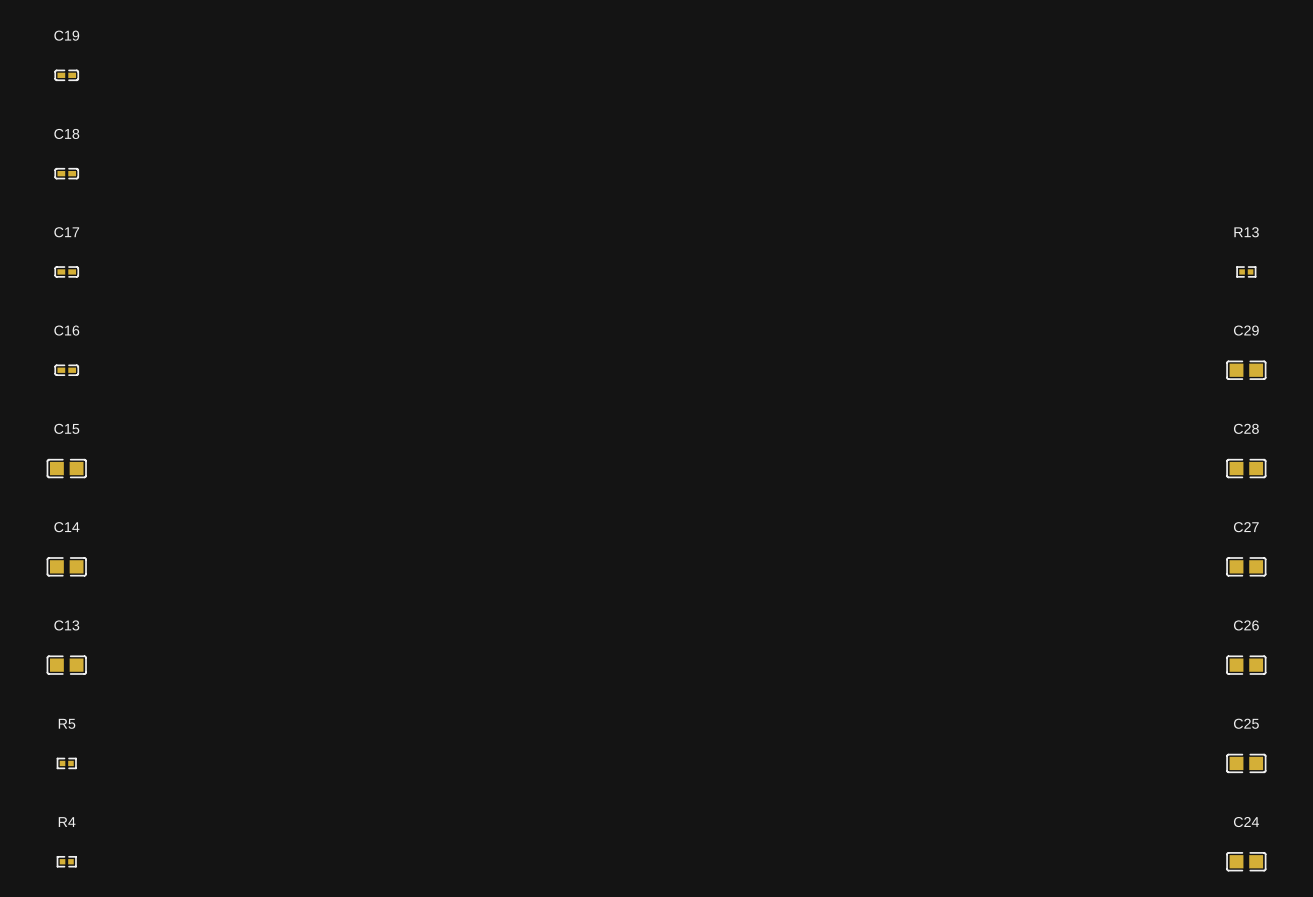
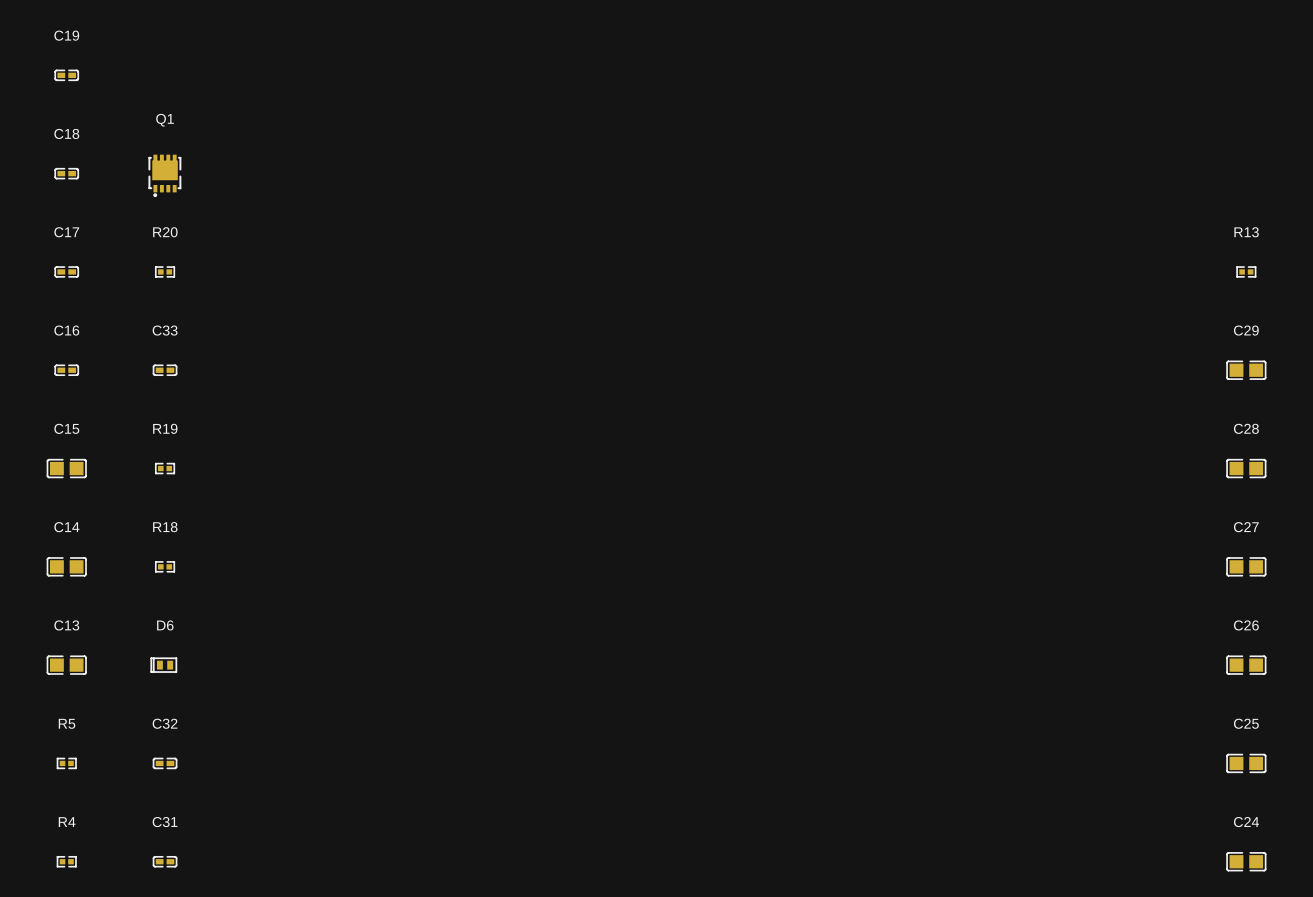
Q1: none -> (164, 175)
R20: none -> (165, 271)
C33: none -> (165, 370)
R19: none -> (165, 468)
R18: none -> (165, 566)
D6: none -> (163, 665)
C32: none -> (165, 763)
C31: none -> (165, 861)

